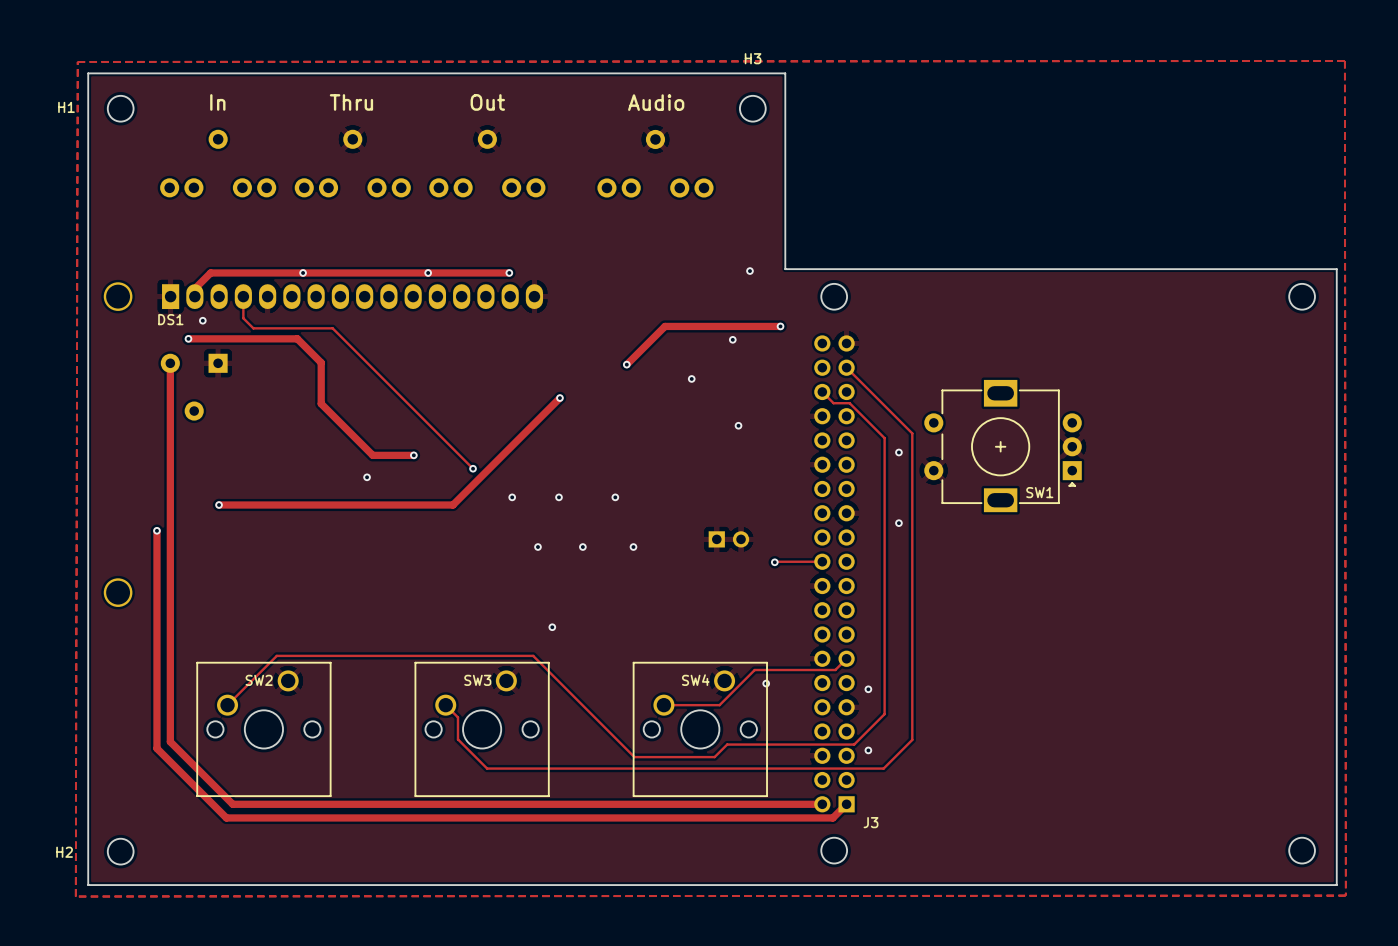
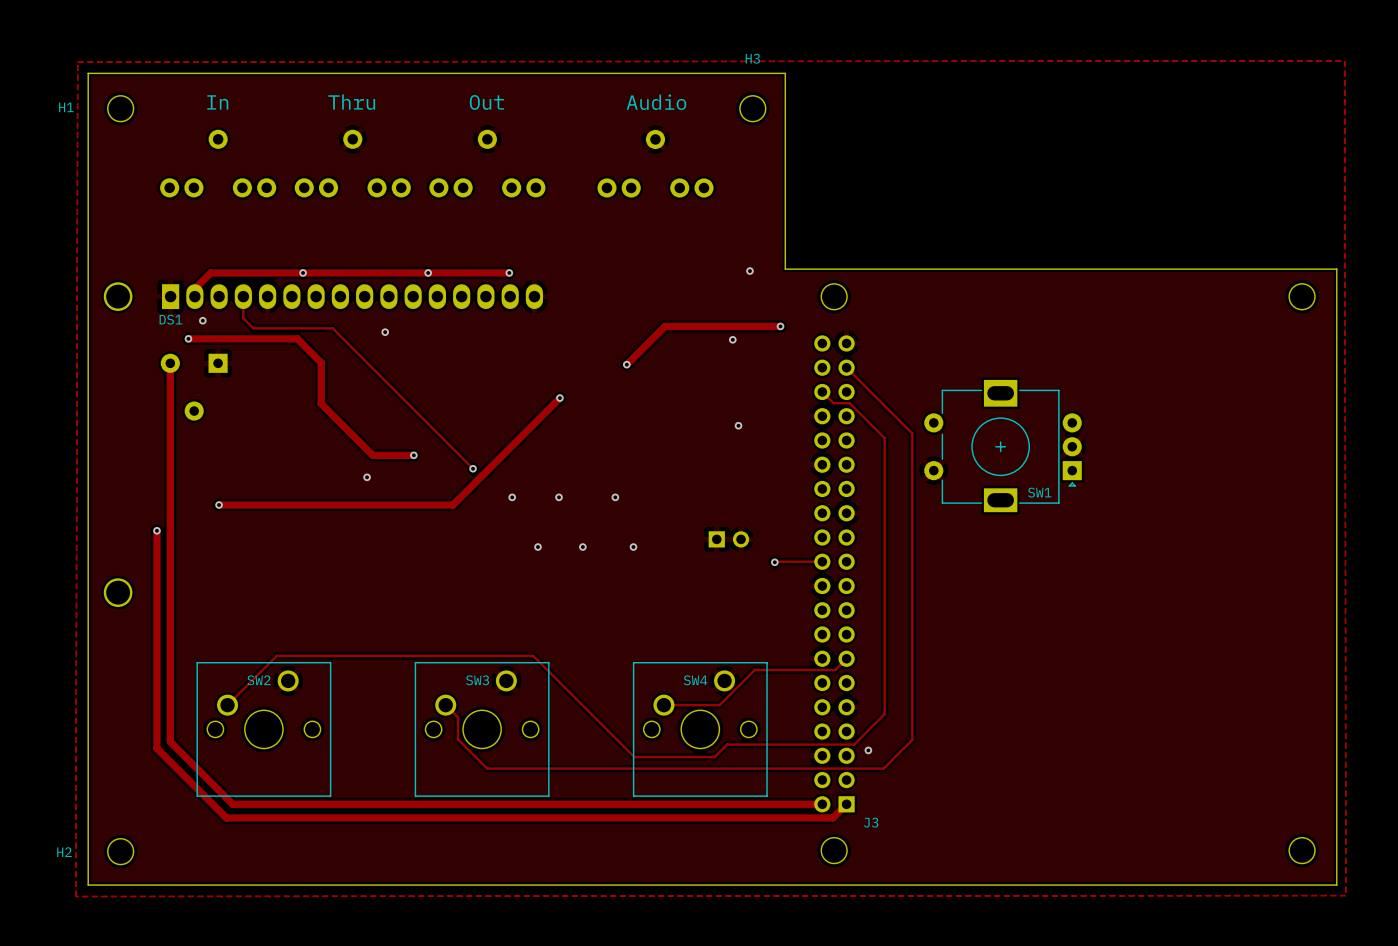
via: none -> (385, 332)
via: (691, 378) -> none
via: (898, 452) -> none
via: (898, 523) -> none
via: (552, 627) -> none
via: (766, 683) -> none
via: (868, 689) -> none

